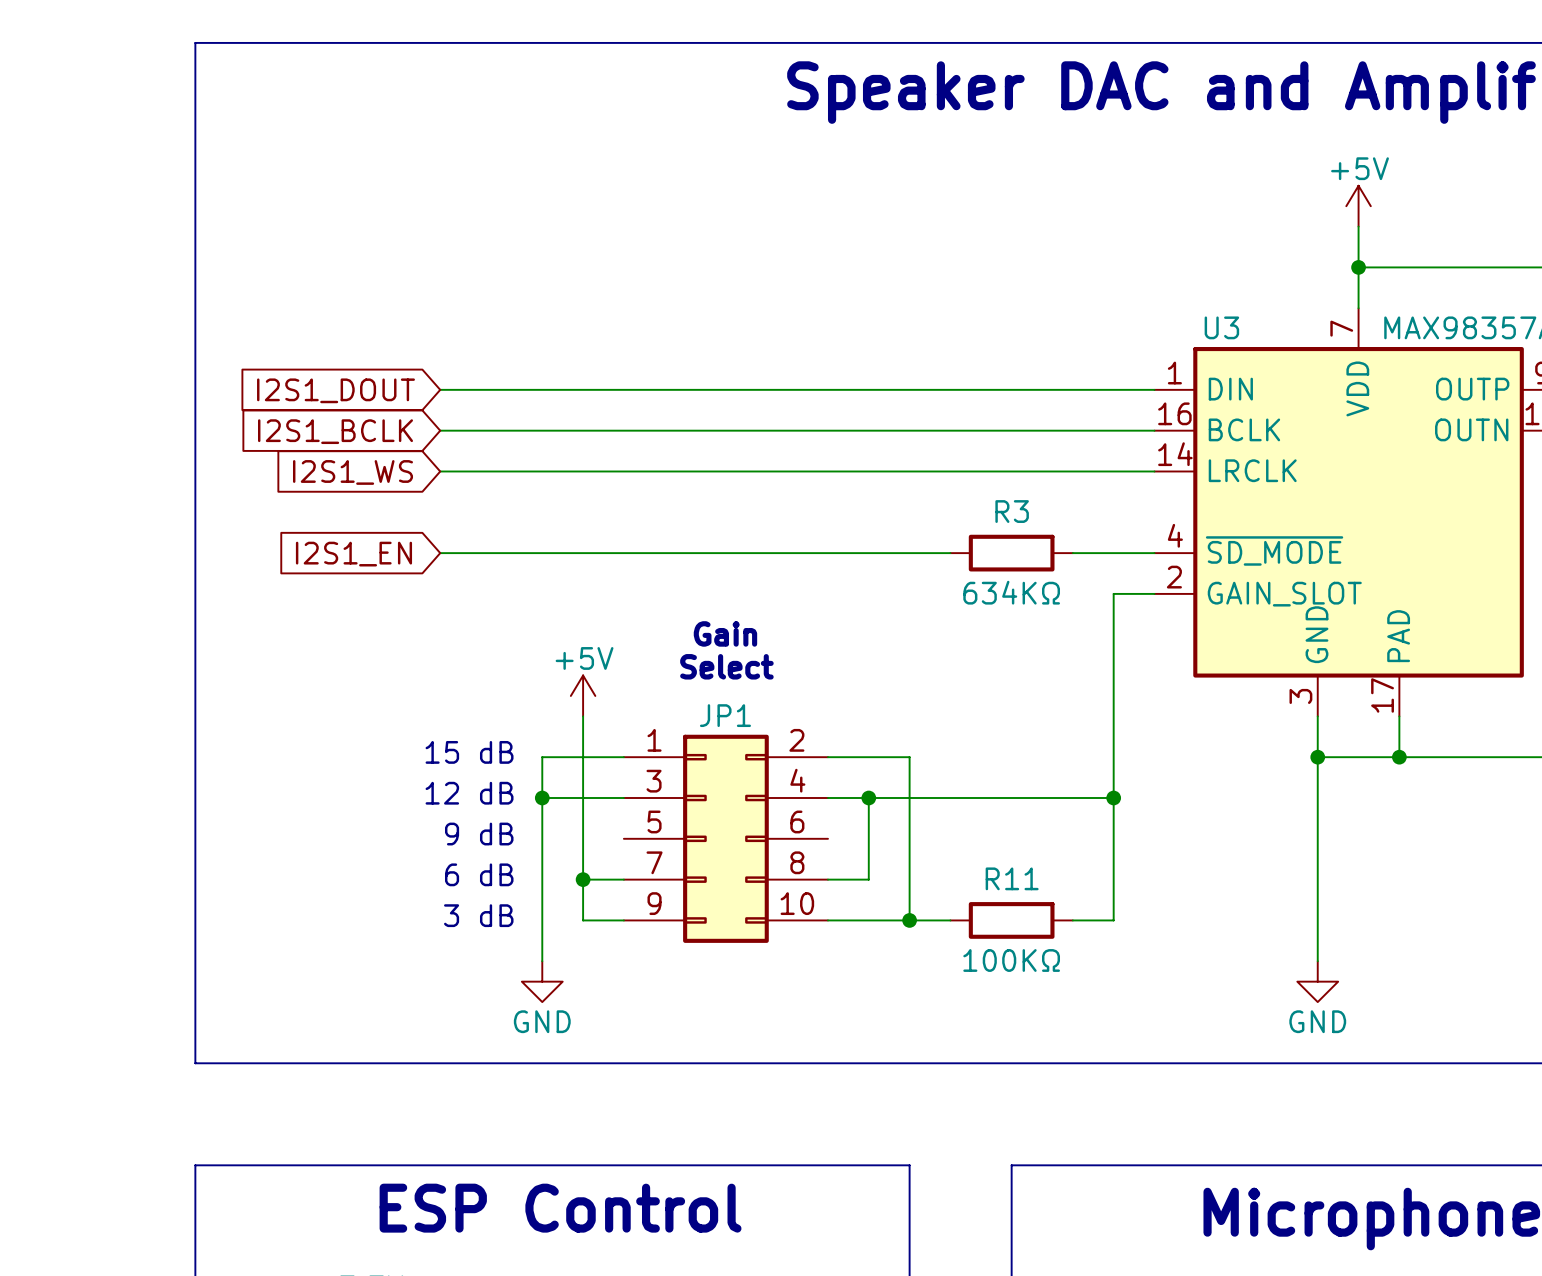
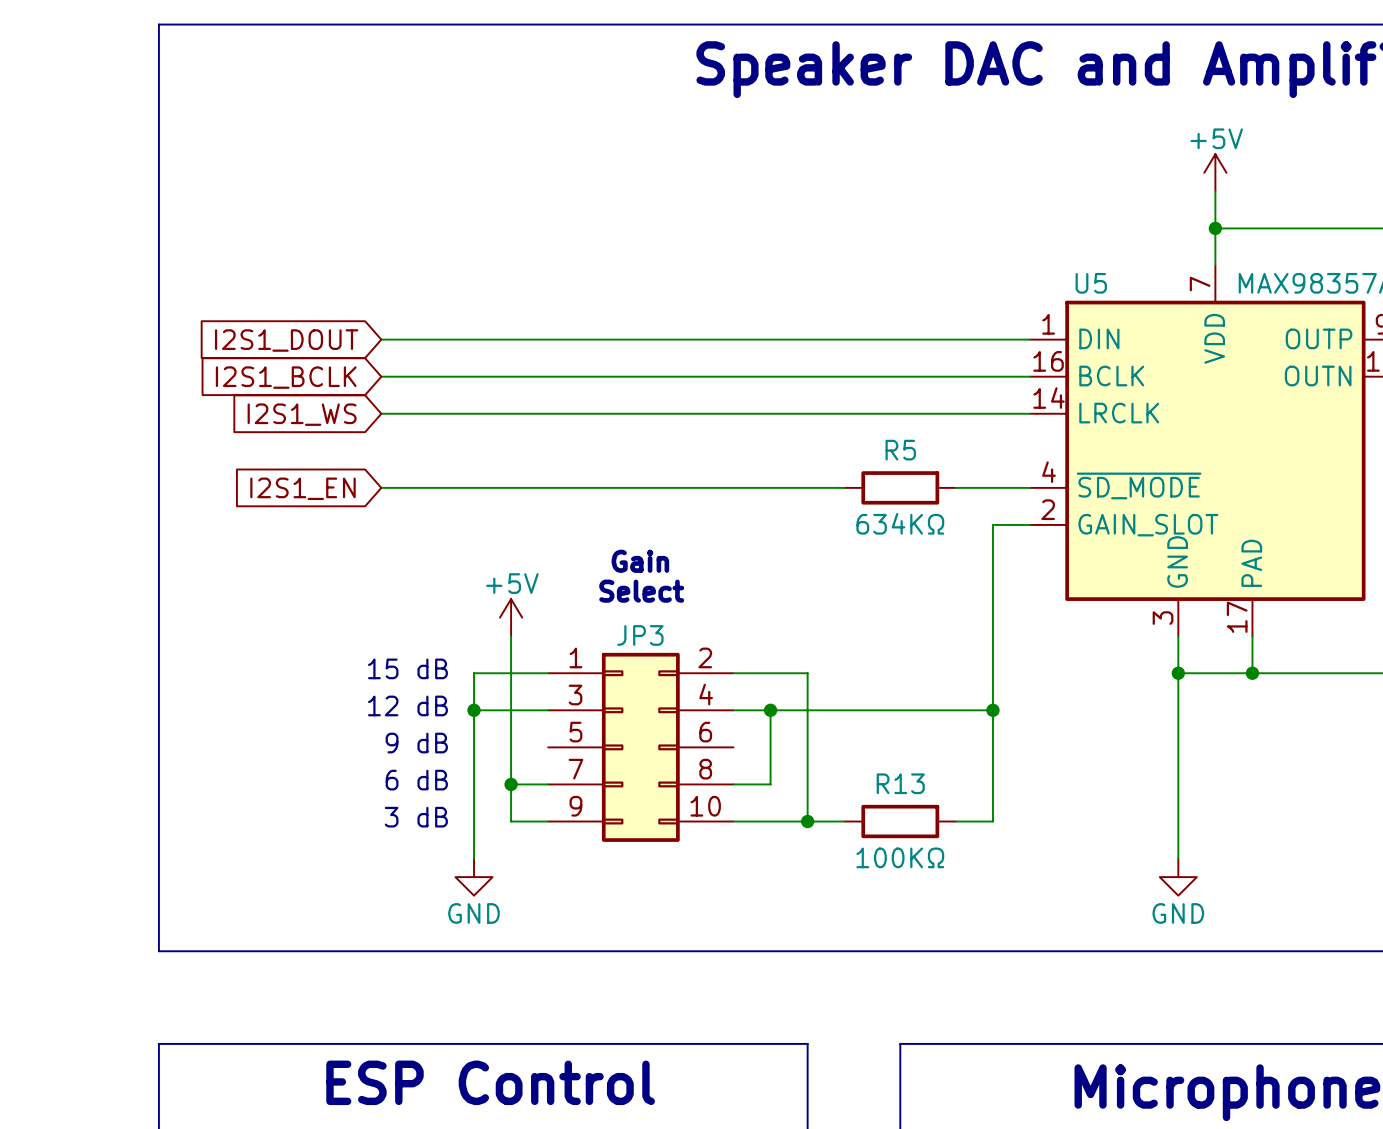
U3 name: U3 (1221, 327) -> U5 (1091, 283)
R3 name: R3 (1012, 511) -> R5 (900, 450)
JP1 name: JP1 (725, 715) -> JP3 (640, 635)
R11 name: R11 (1012, 878) -> R13 (900, 783)

